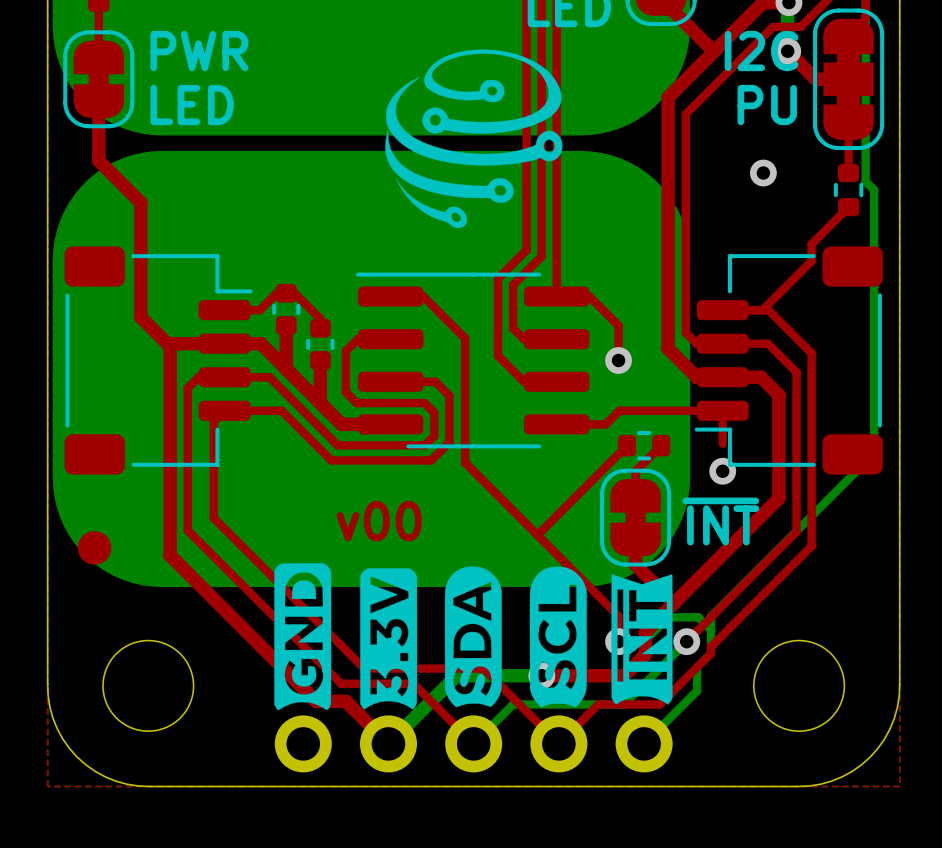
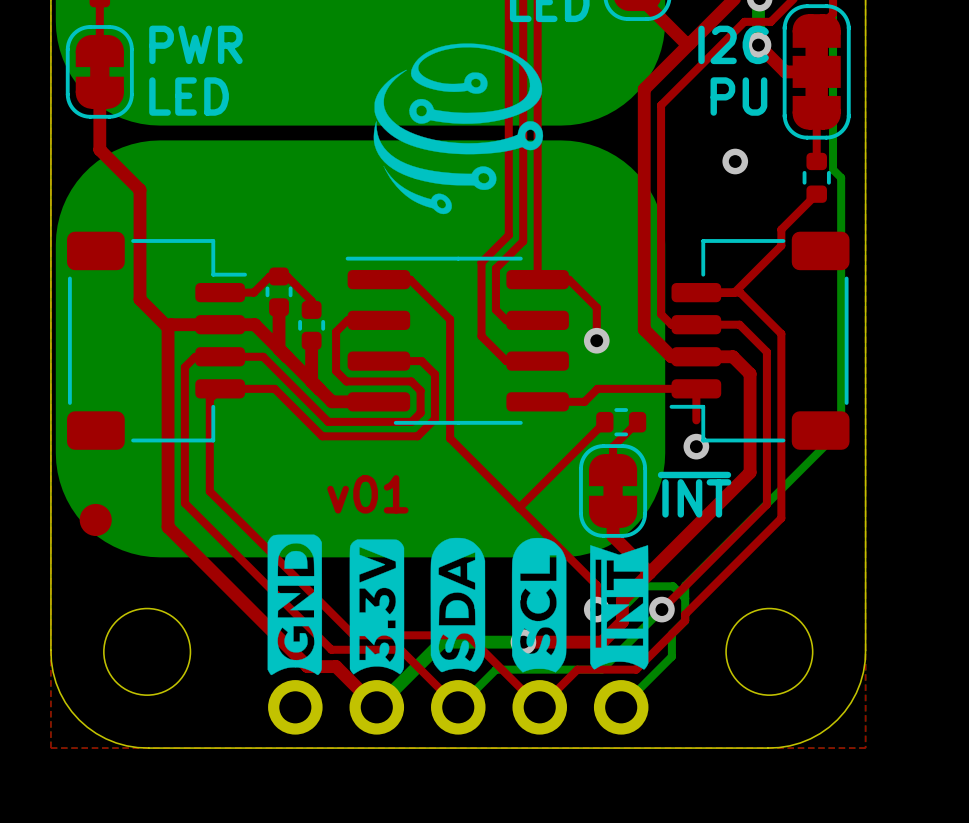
text: v00 (379, 521) -> v01 (367, 494)

